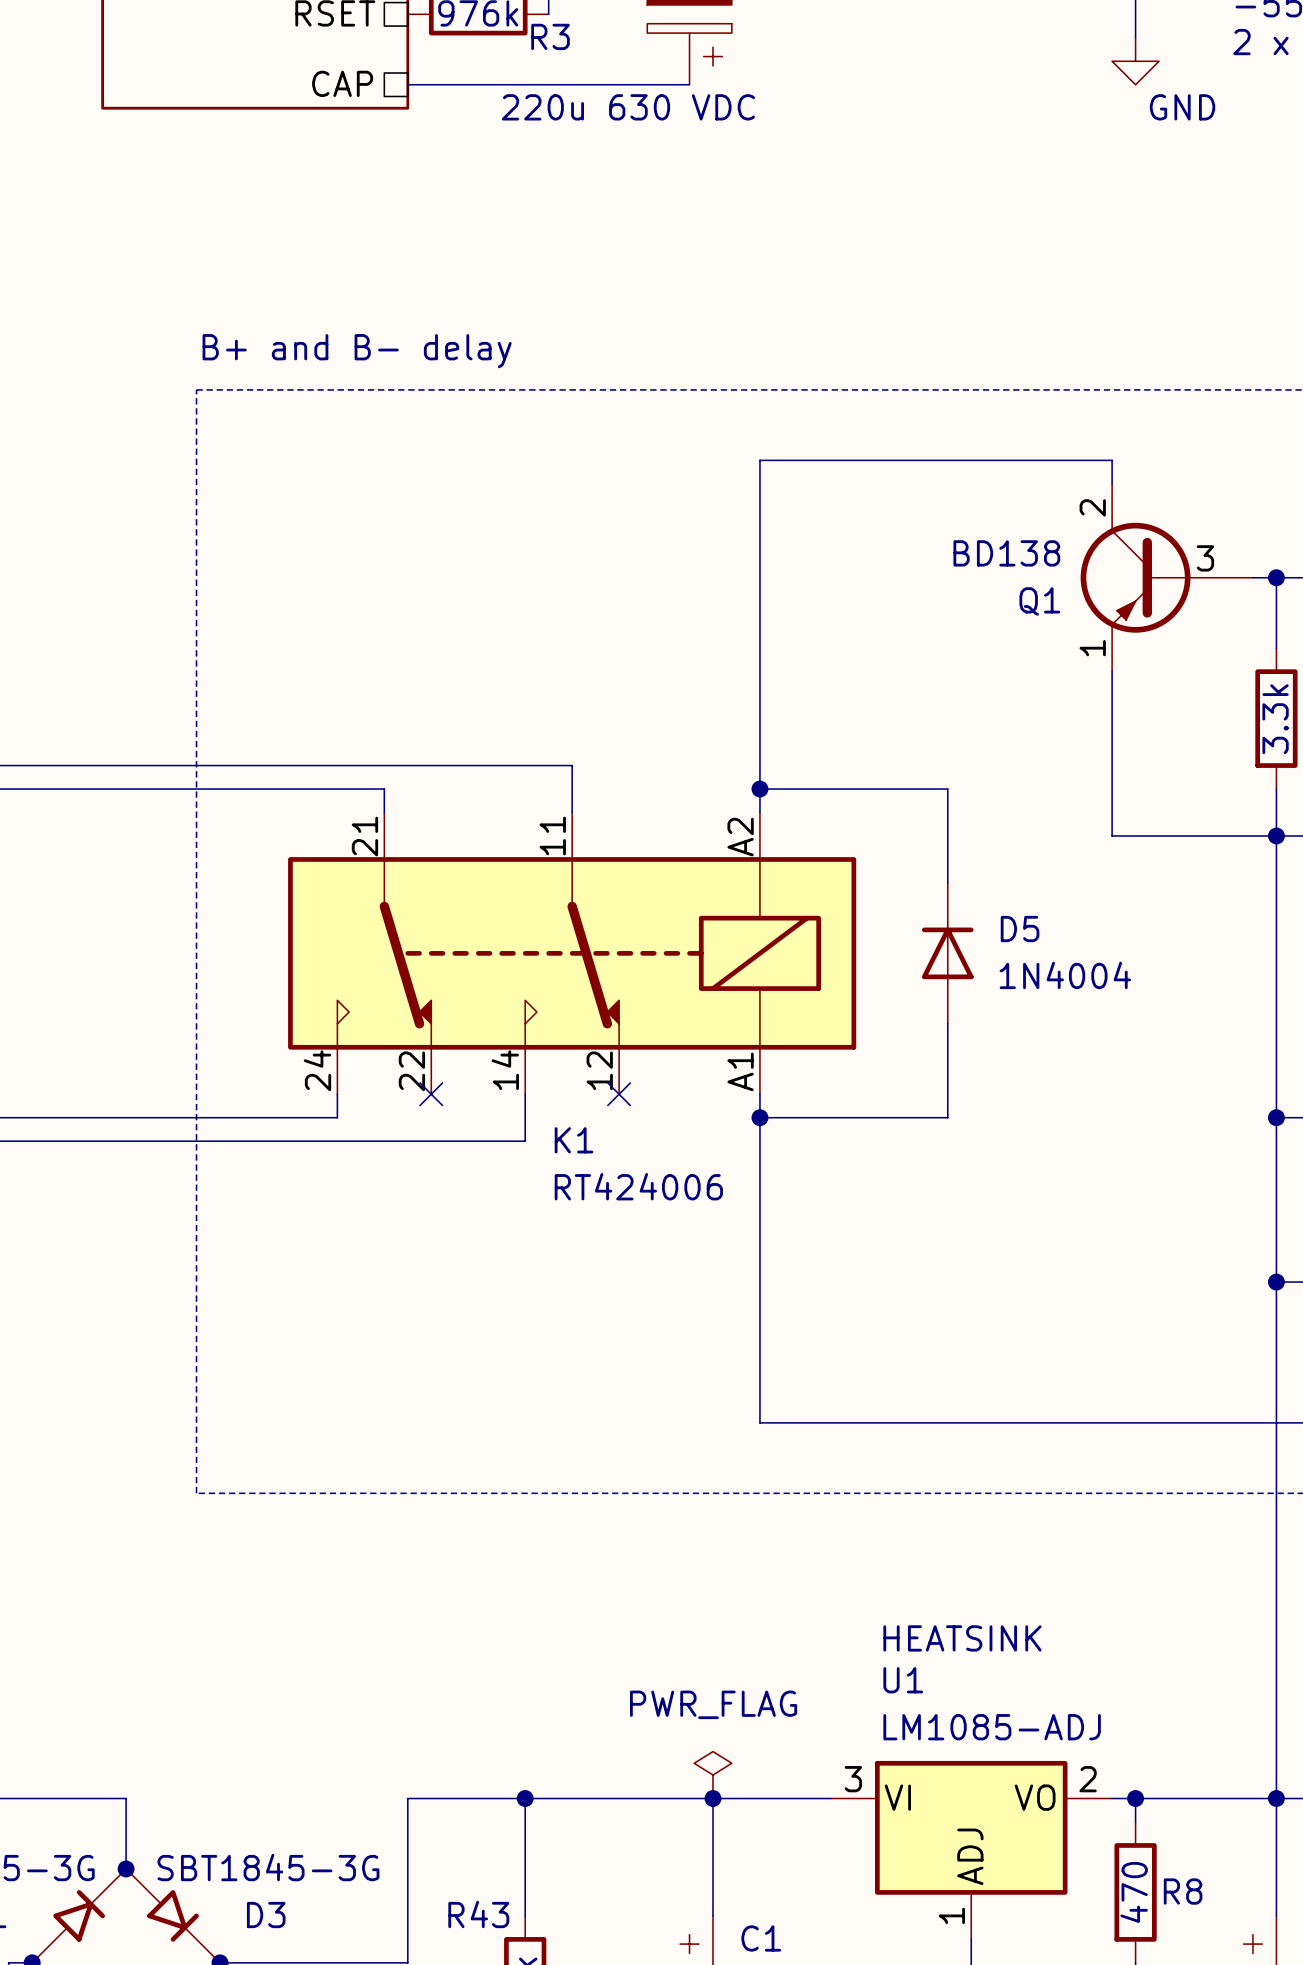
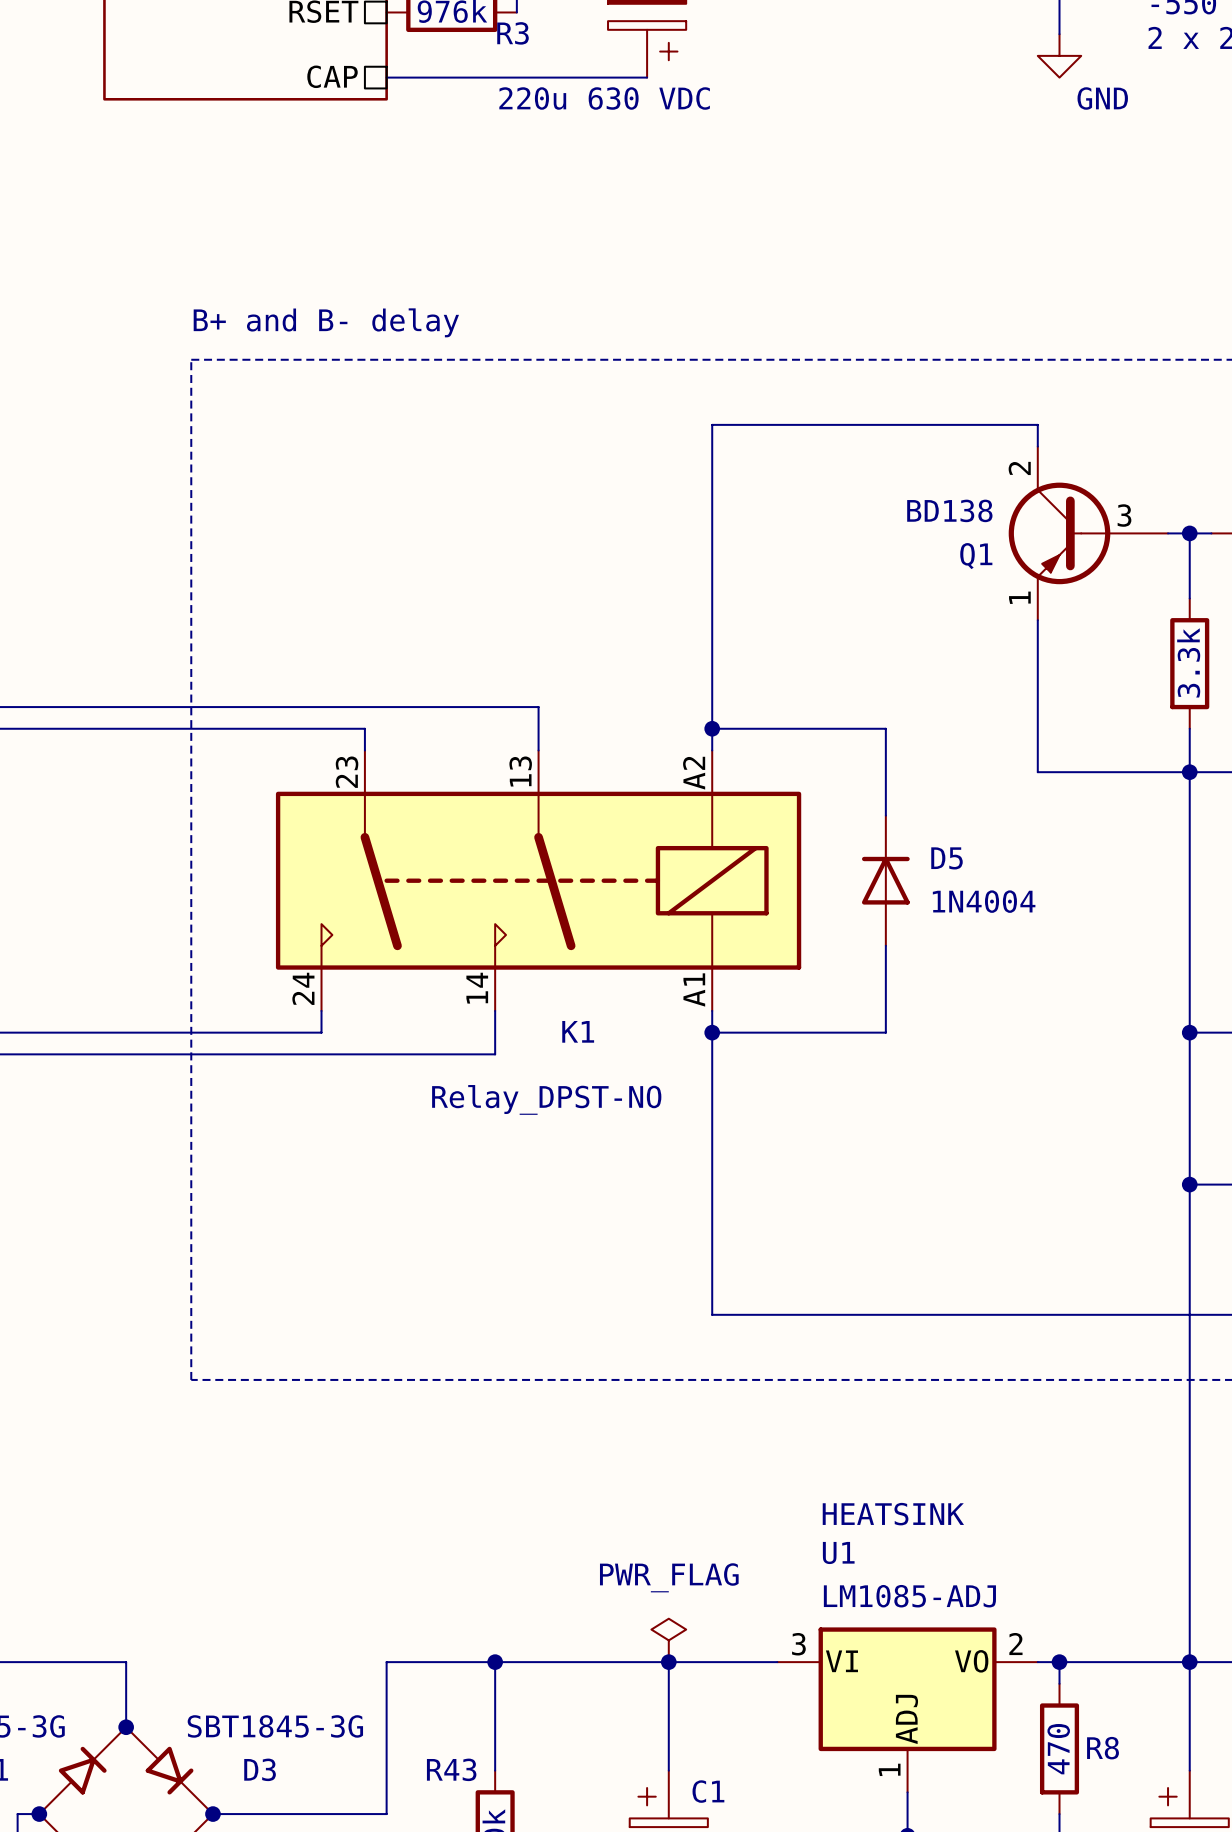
K1 symbol: [288, 812, 857, 1095] -> [275, 750, 802, 1011]
no-connect mark: (431, 1094) -> none
no-connect mark: (619, 1094) -> none
K1 name position: K1 (574, 1140) -> K1 (578, 1031)
K1 value: RT424006 (638, 1186) -> Relay_DPST-NO (546, 1099)

